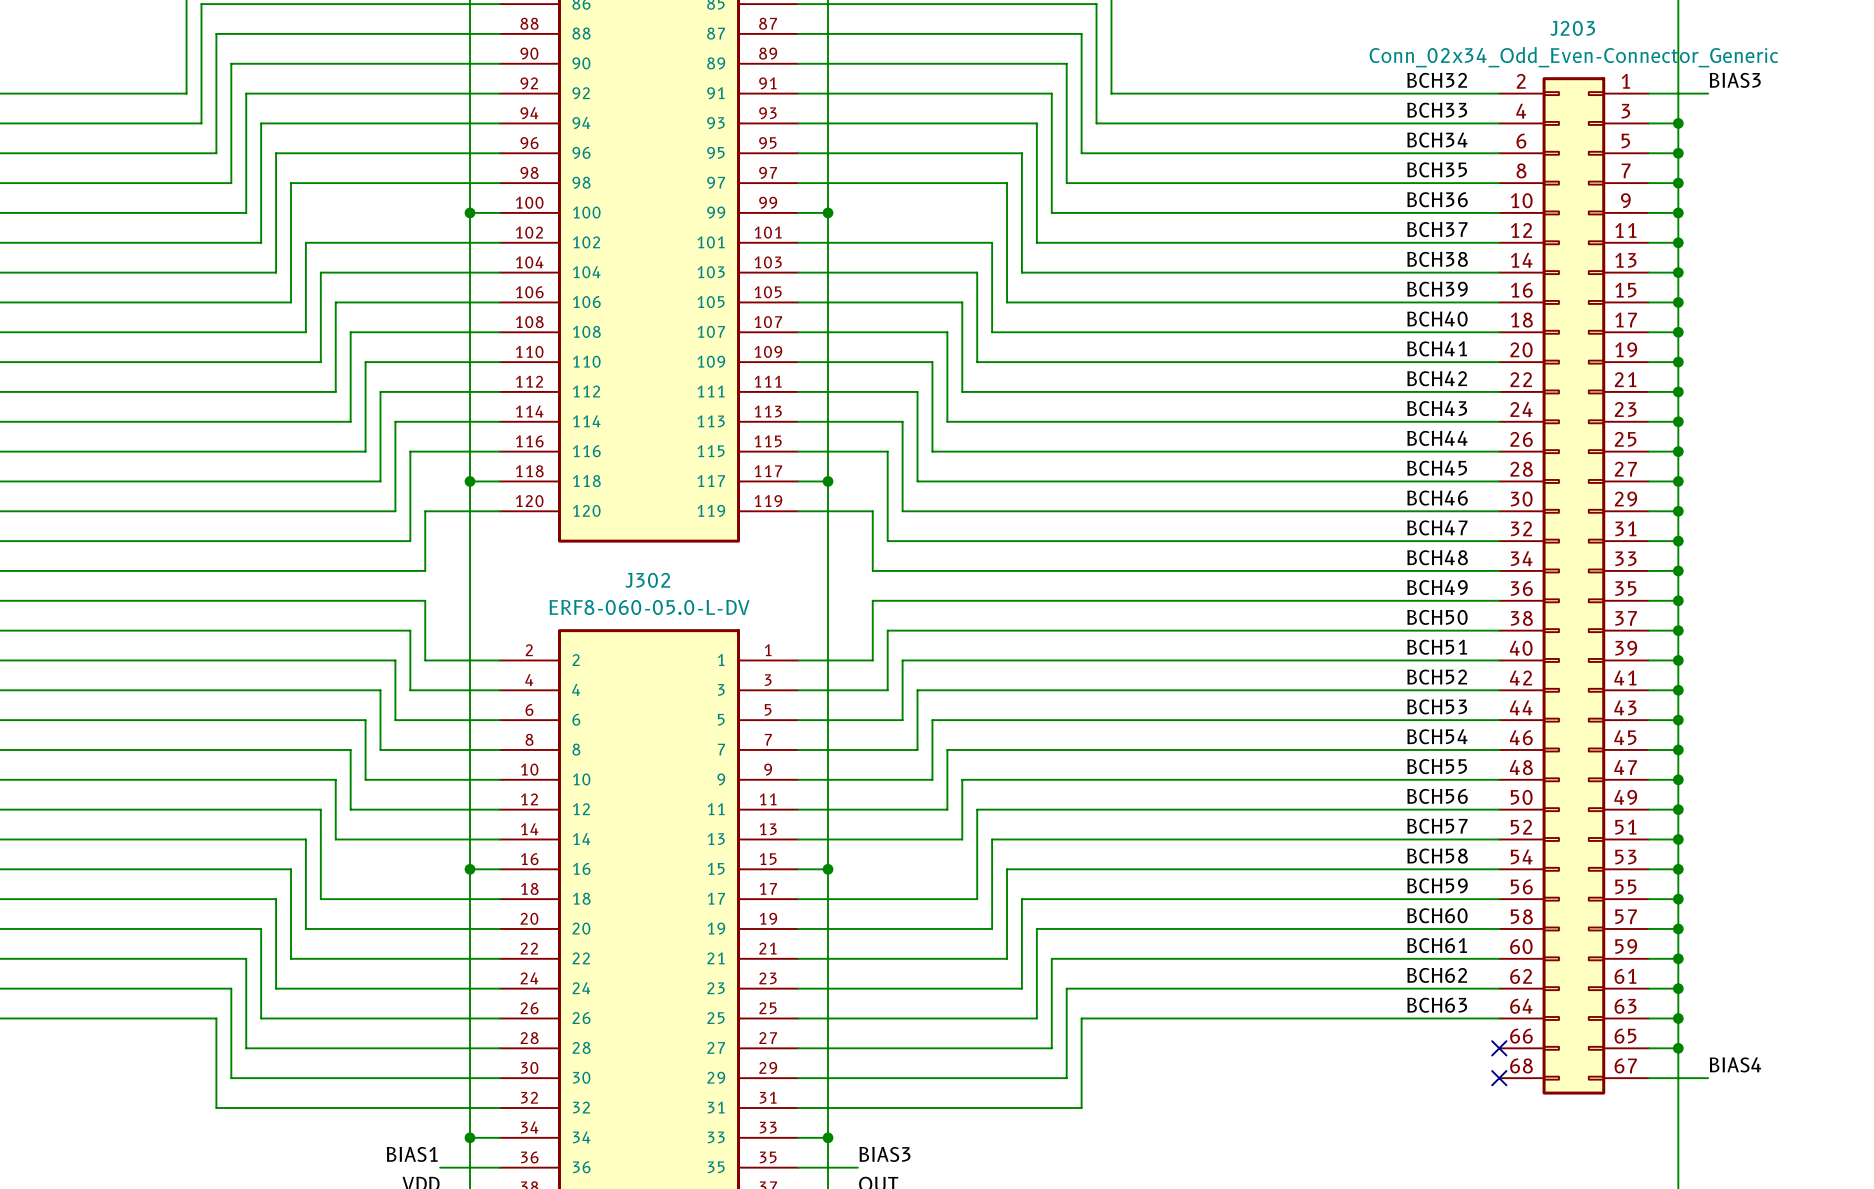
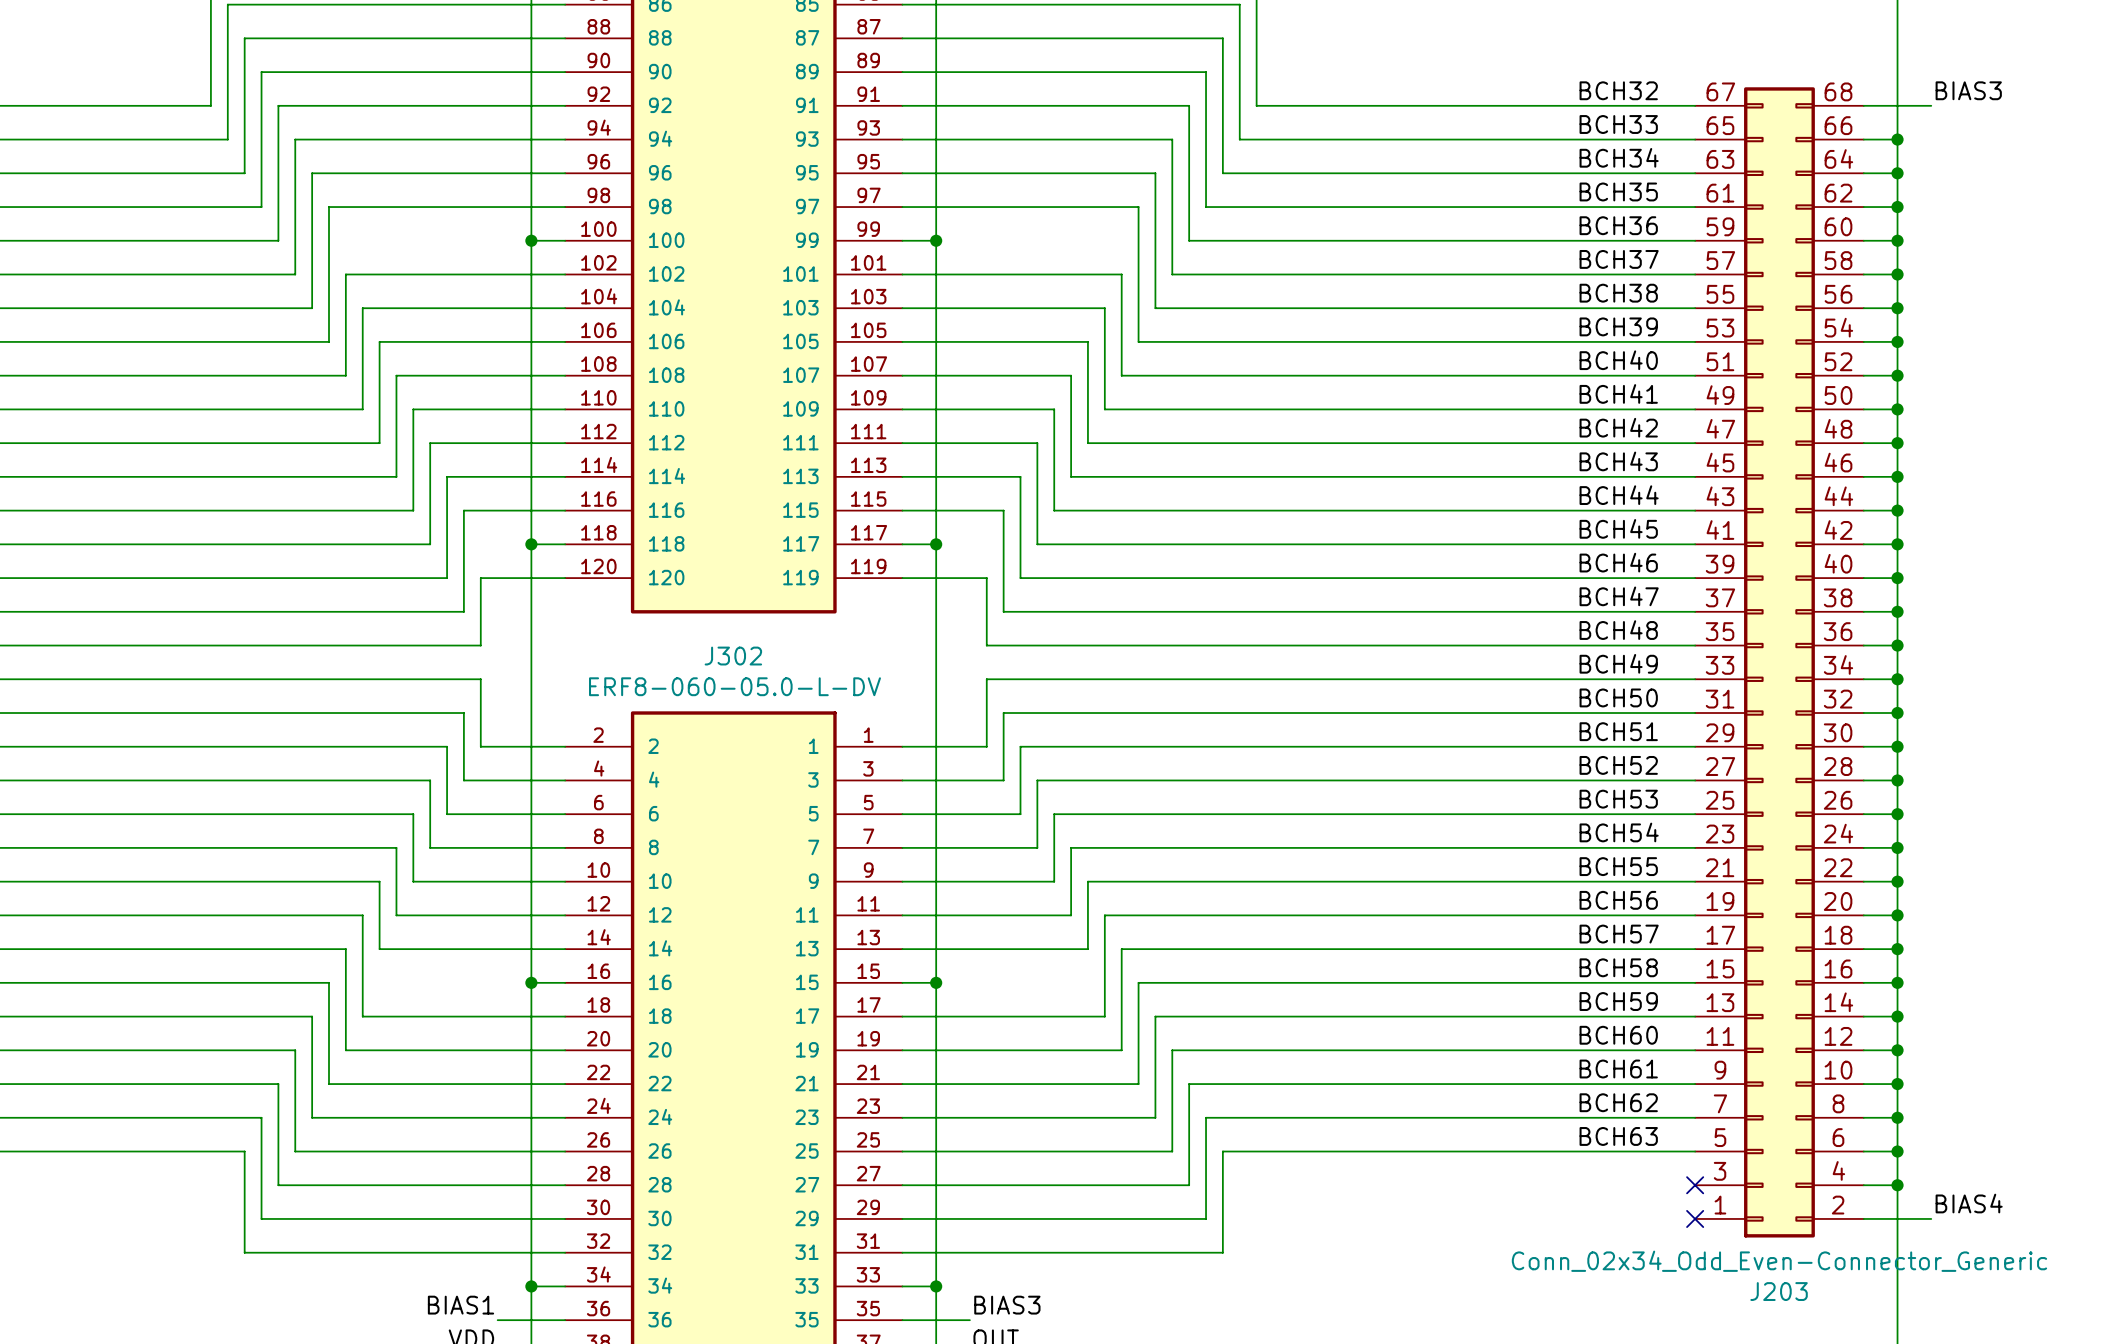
J203 rotation: 0° (1573, 585) -> 180° (1779, 662)

